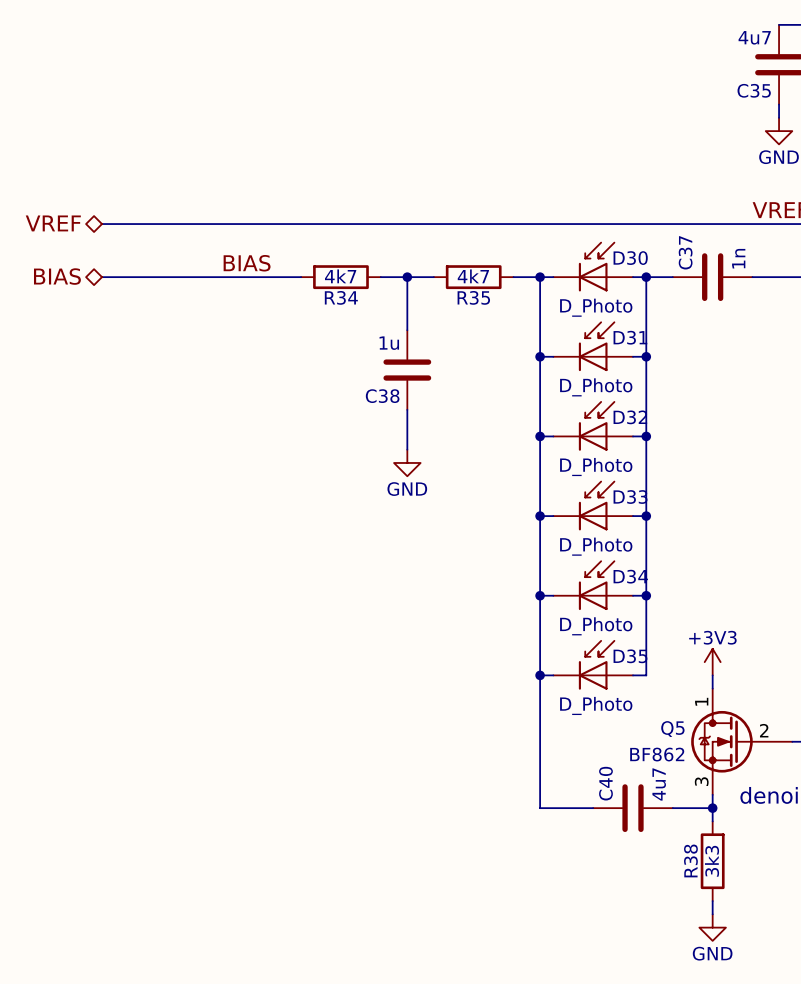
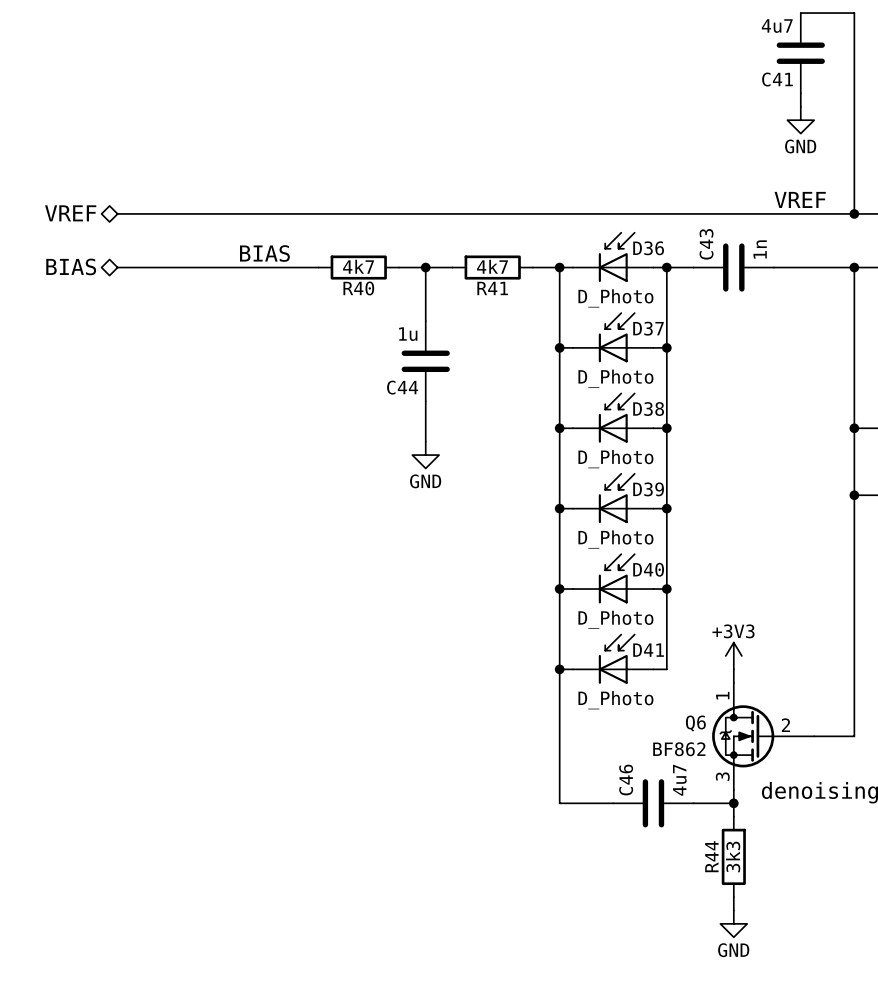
C35 name: C35 (754, 90) -> C41 (777, 79)
C37 name: C37 (685, 252) -> C43 (706, 244)
D30 name: D30 (630, 258) -> D36 (648, 248)
R34 name: R34 (341, 297) -> R40 (358, 288)
R35 name: R35 (473, 297) -> R41 (492, 288)
D31 name: D31 (630, 337) -> D37 (648, 328)
C38 name: C38 (382, 396) -> C44 (402, 387)
D32 name: D32 (630, 417) -> D38 (648, 409)
D33 name: D33 (630, 497) -> D39 (648, 489)
D34 name: D34 (630, 576) -> D40 (648, 569)
D35 name: D35 (630, 656) -> D41 (648, 650)
Q5 name: Q5 (672, 729) -> Q6 (695, 723)
C40 name: C40 (605, 783) -> C46 (626, 780)
R38 name: R38 (690, 860) -> R44 (711, 856)

